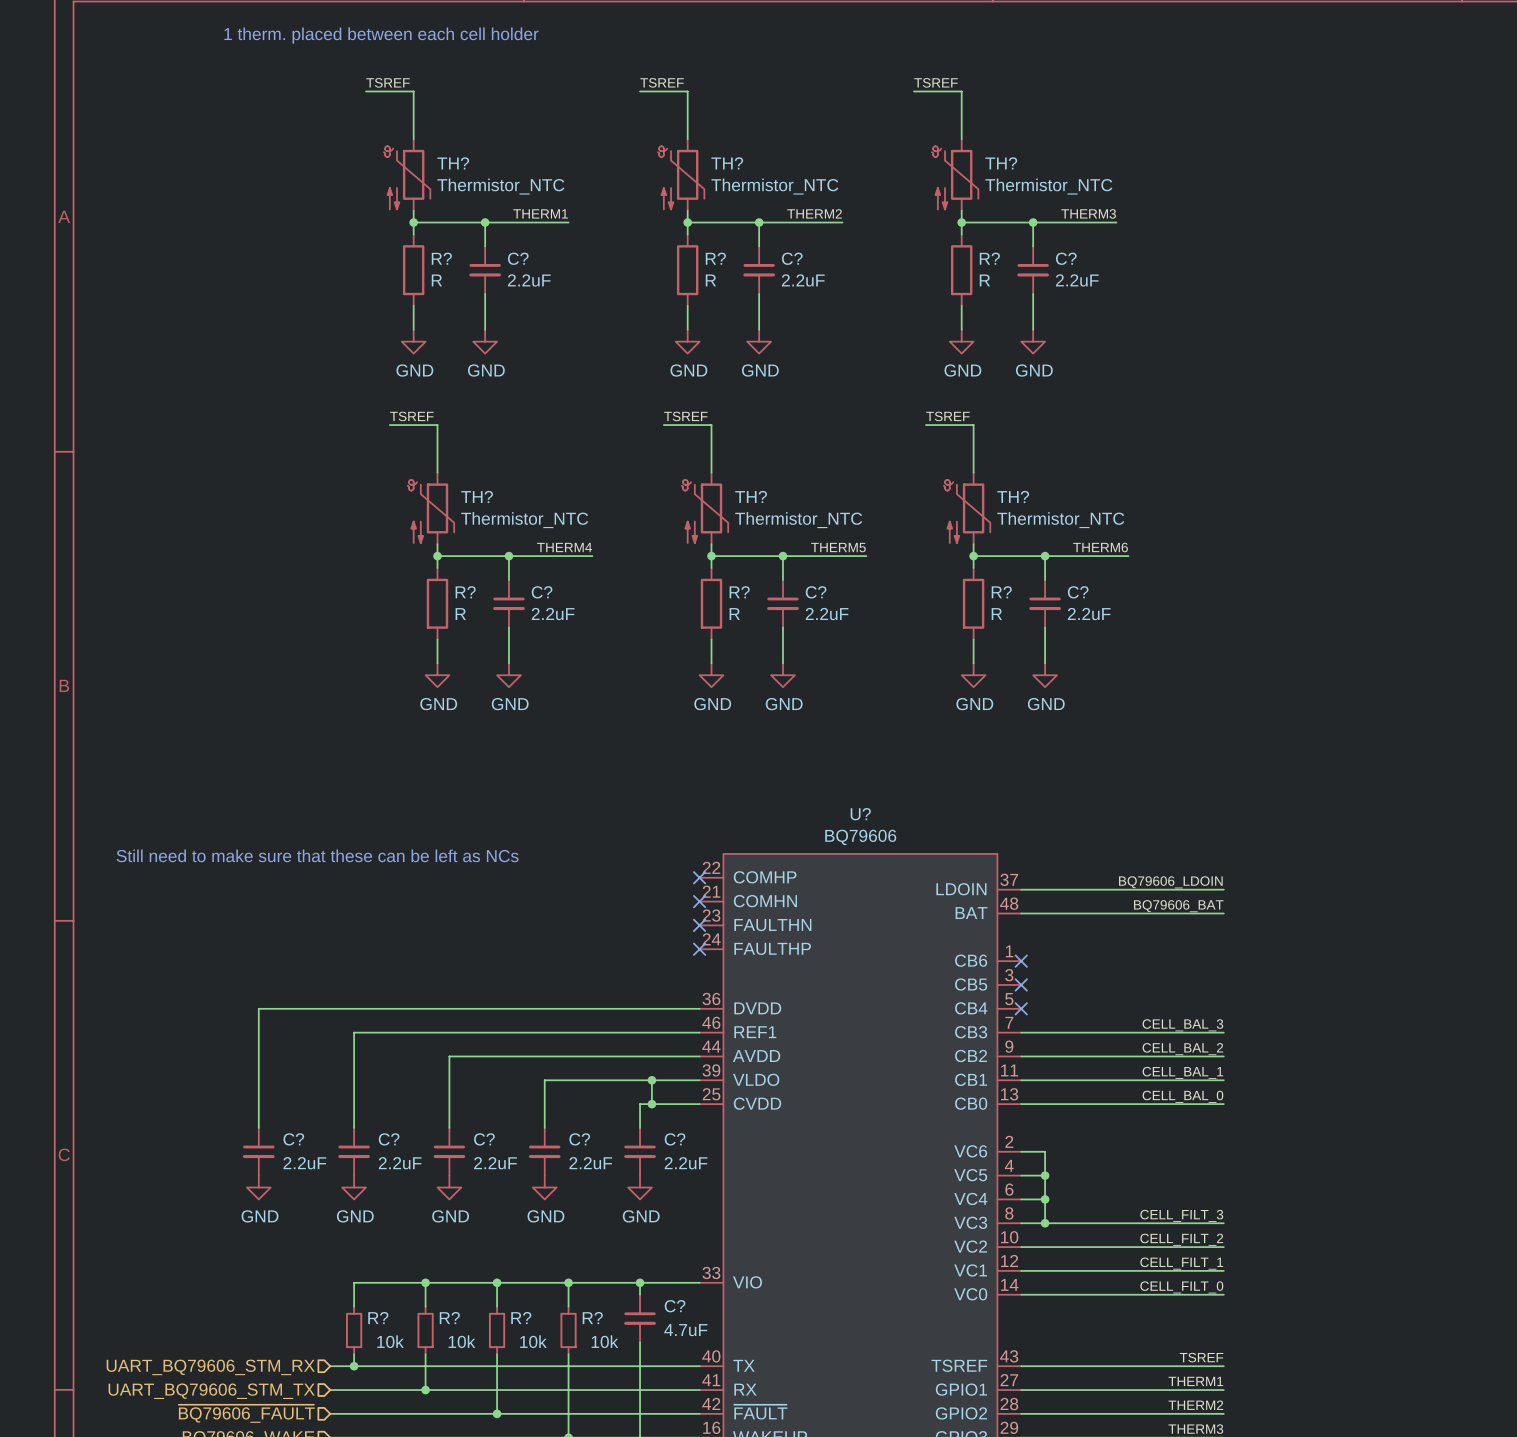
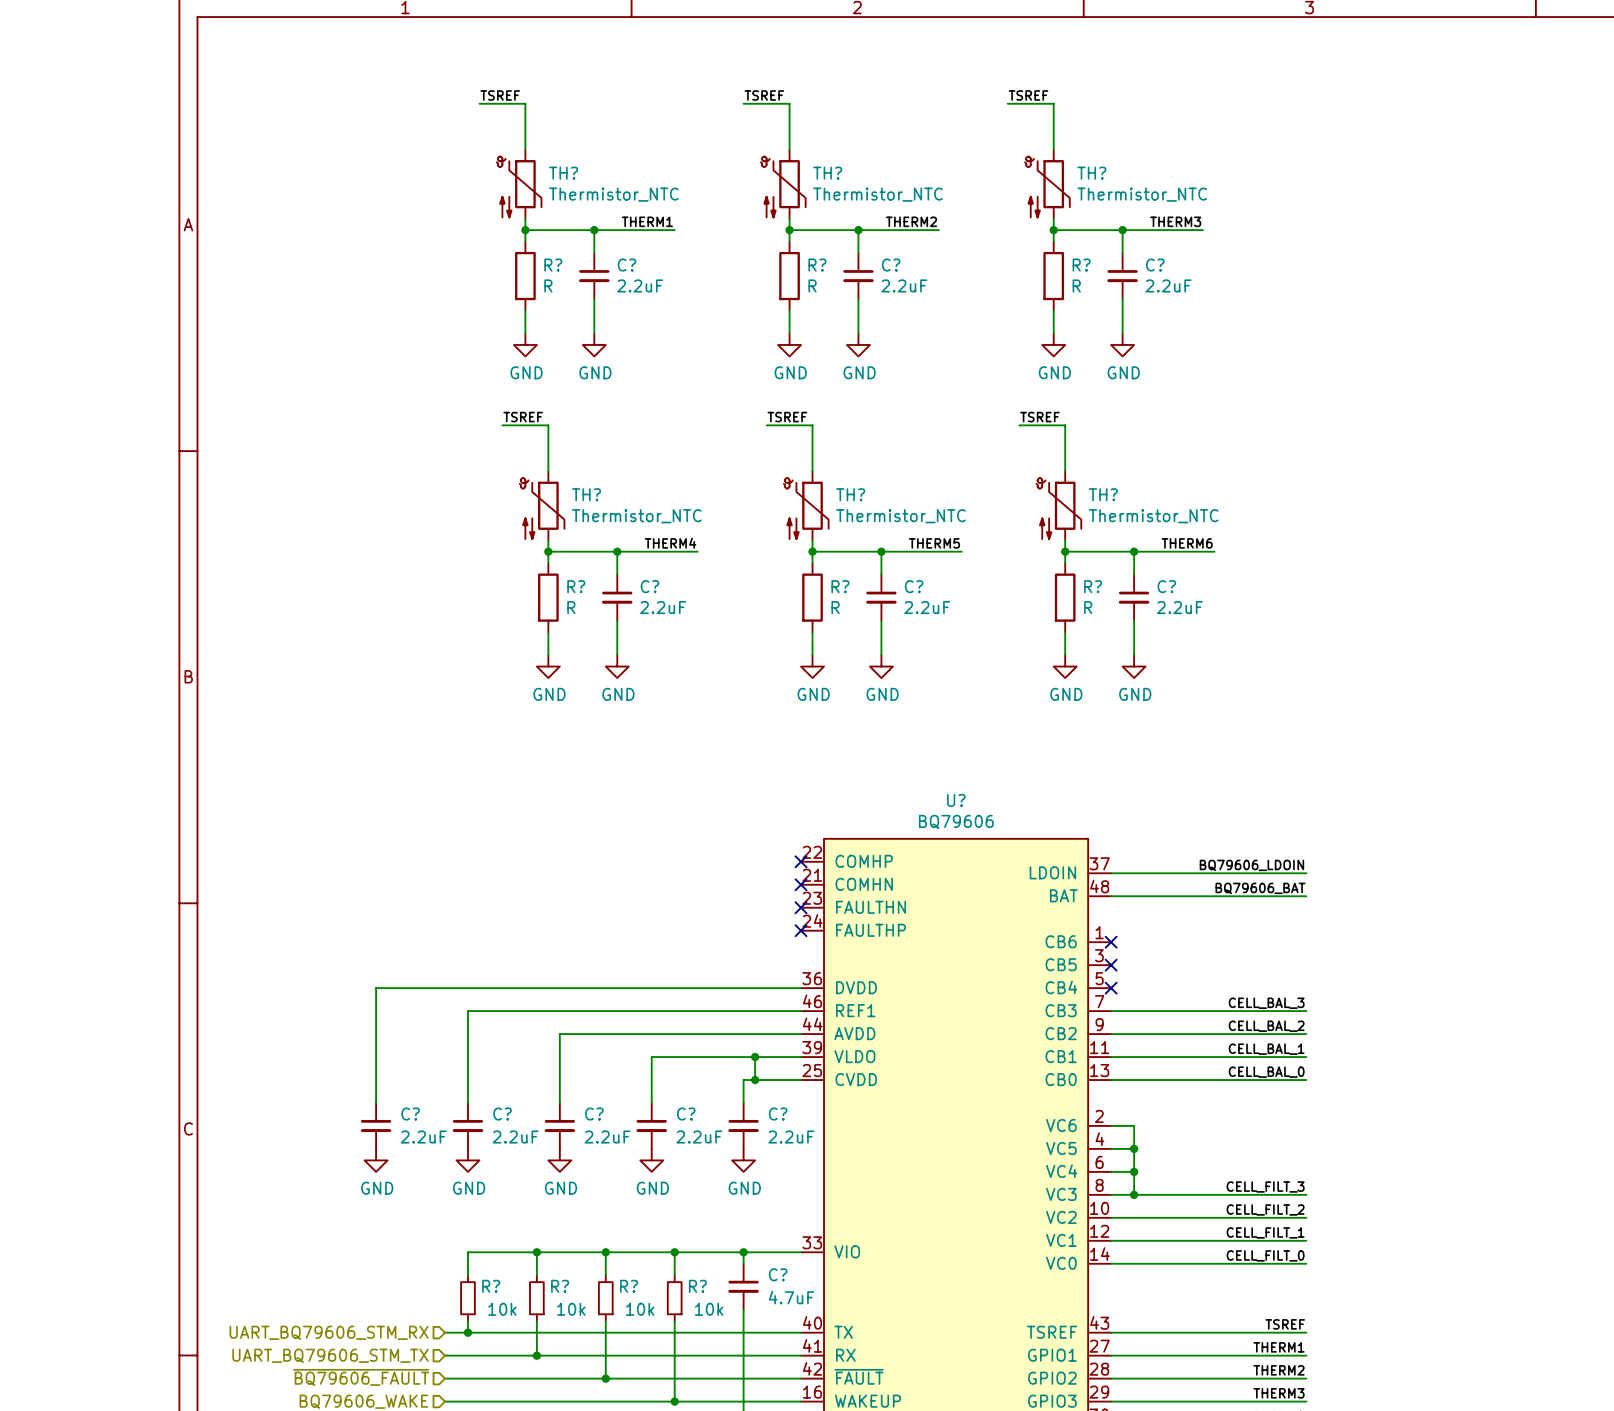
text: 1 therm. placed between each cell holder (381, 35) -> none
text: Still need to make sure that these can be left as NCs (317, 855) -> none

